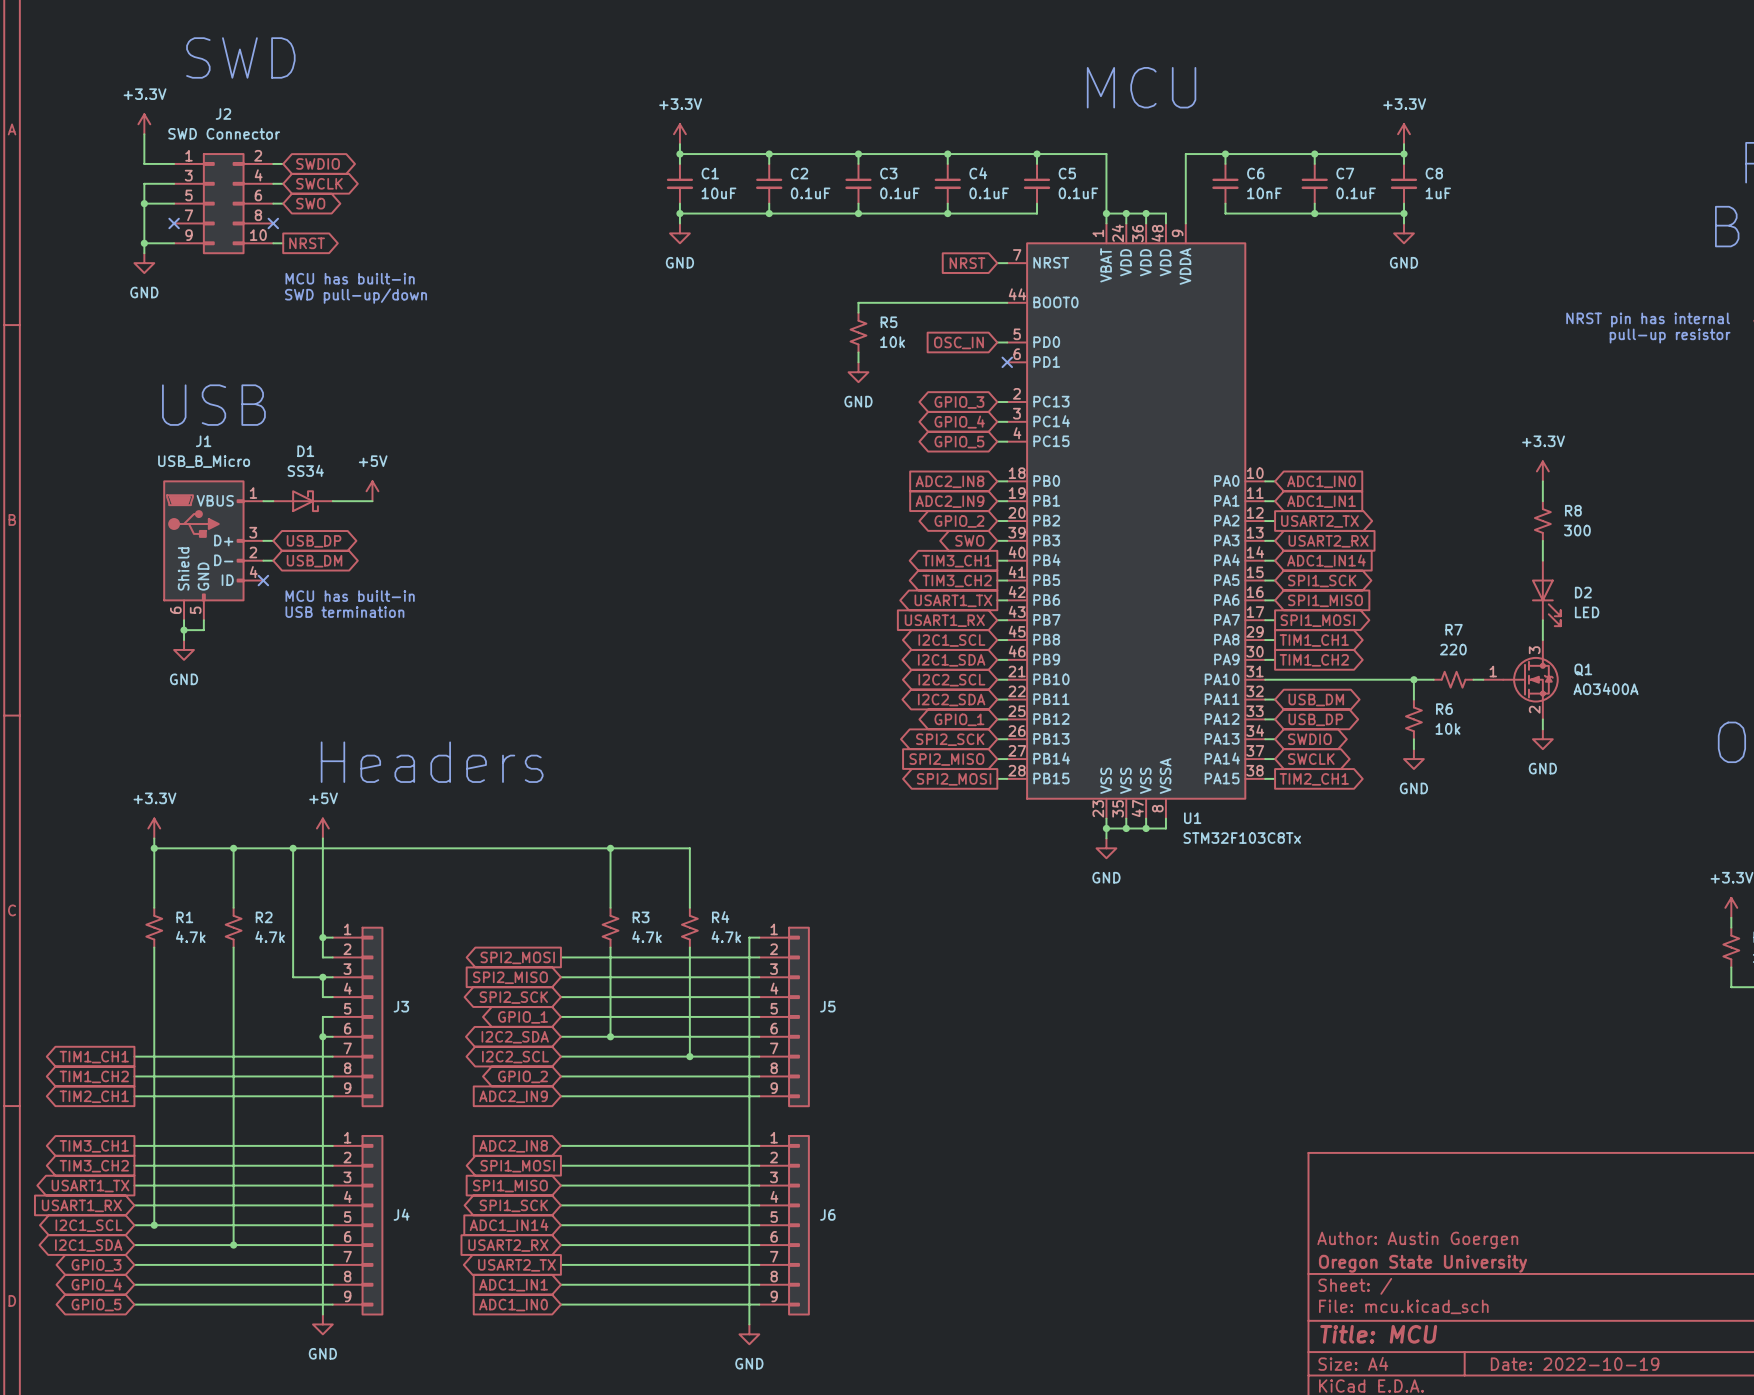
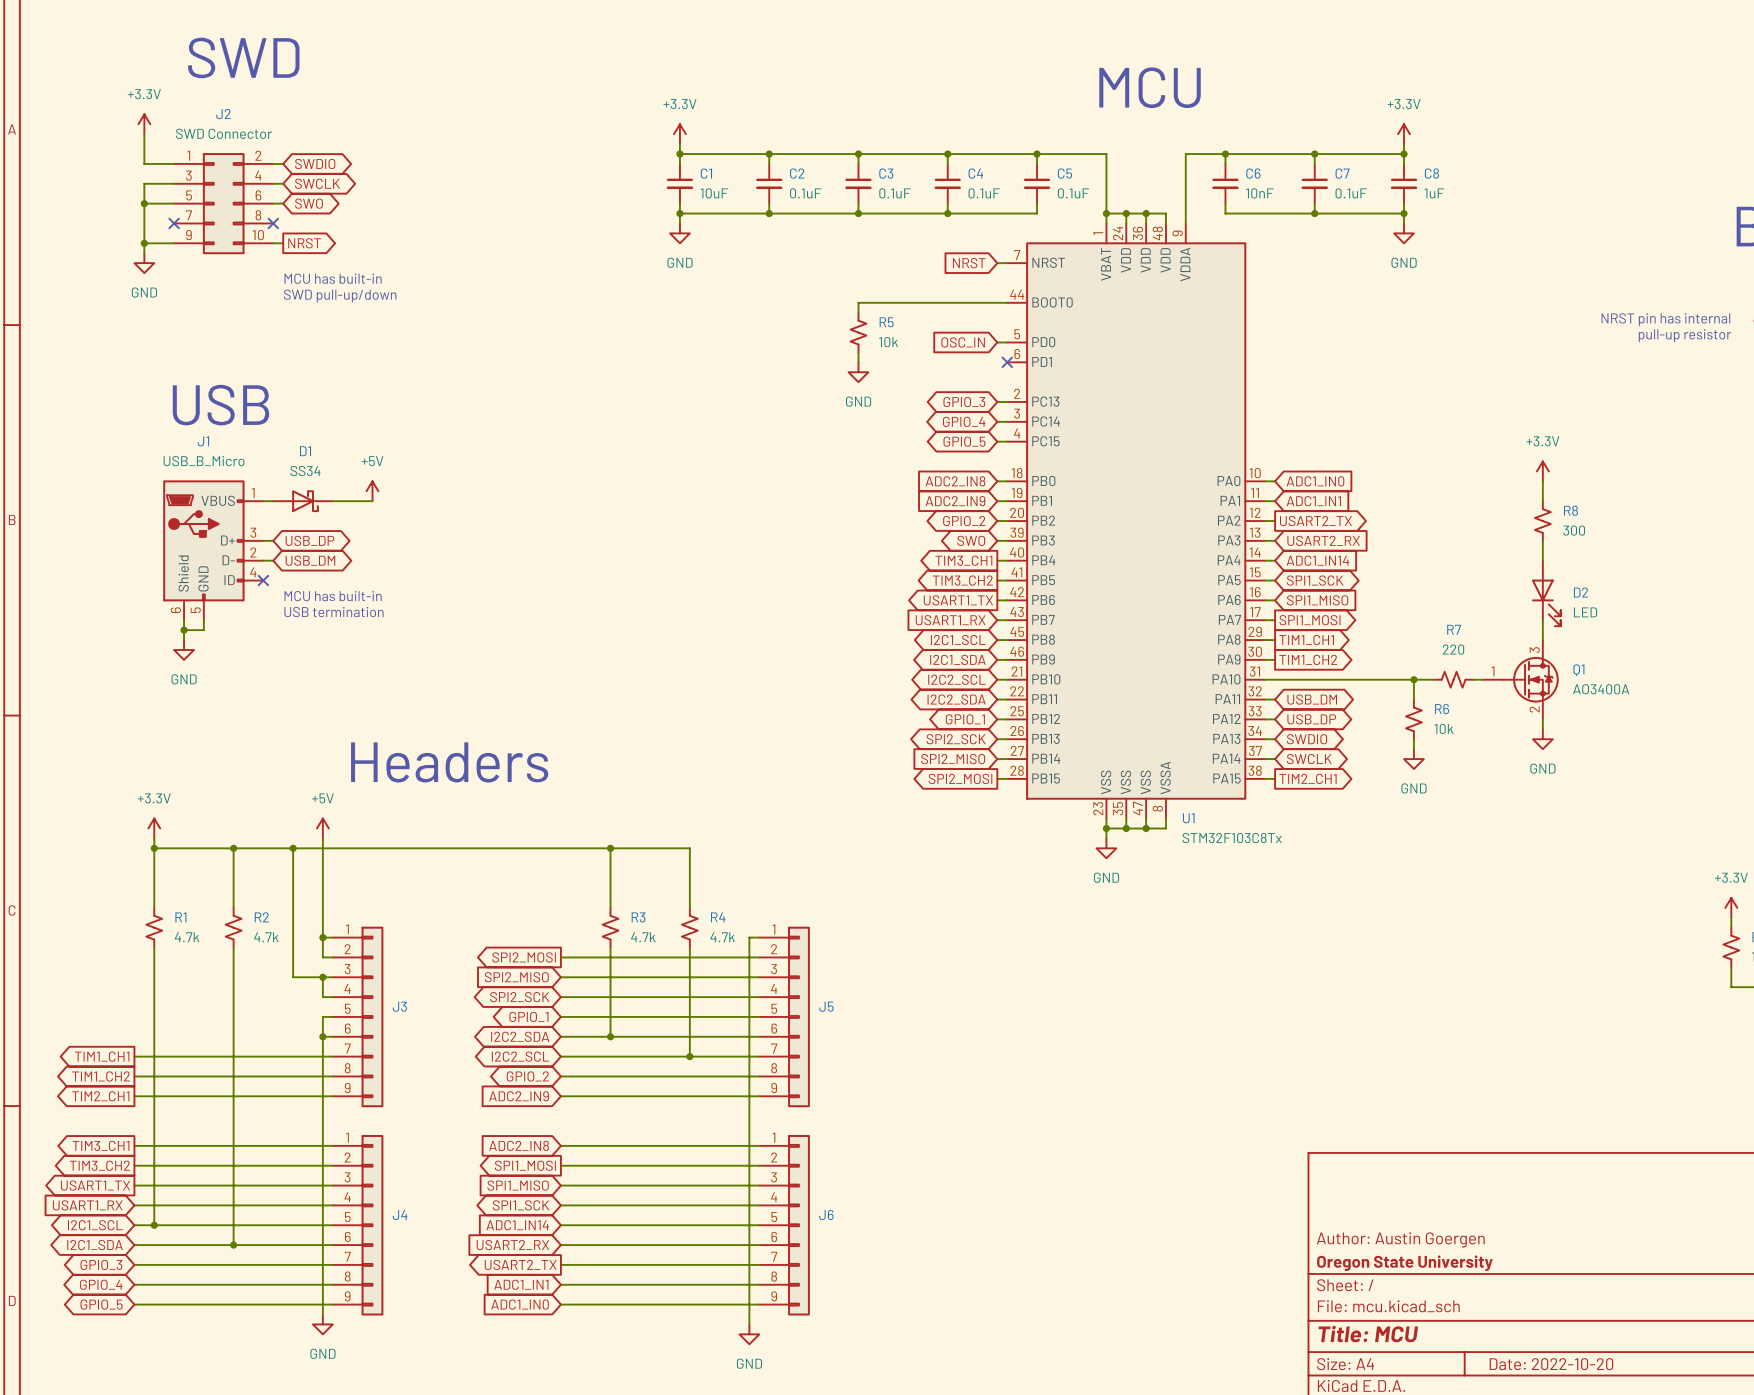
title block: Date: 2022-10-19 (1575, 1364) -> Date: 2022-10-20 (1551, 1364)

